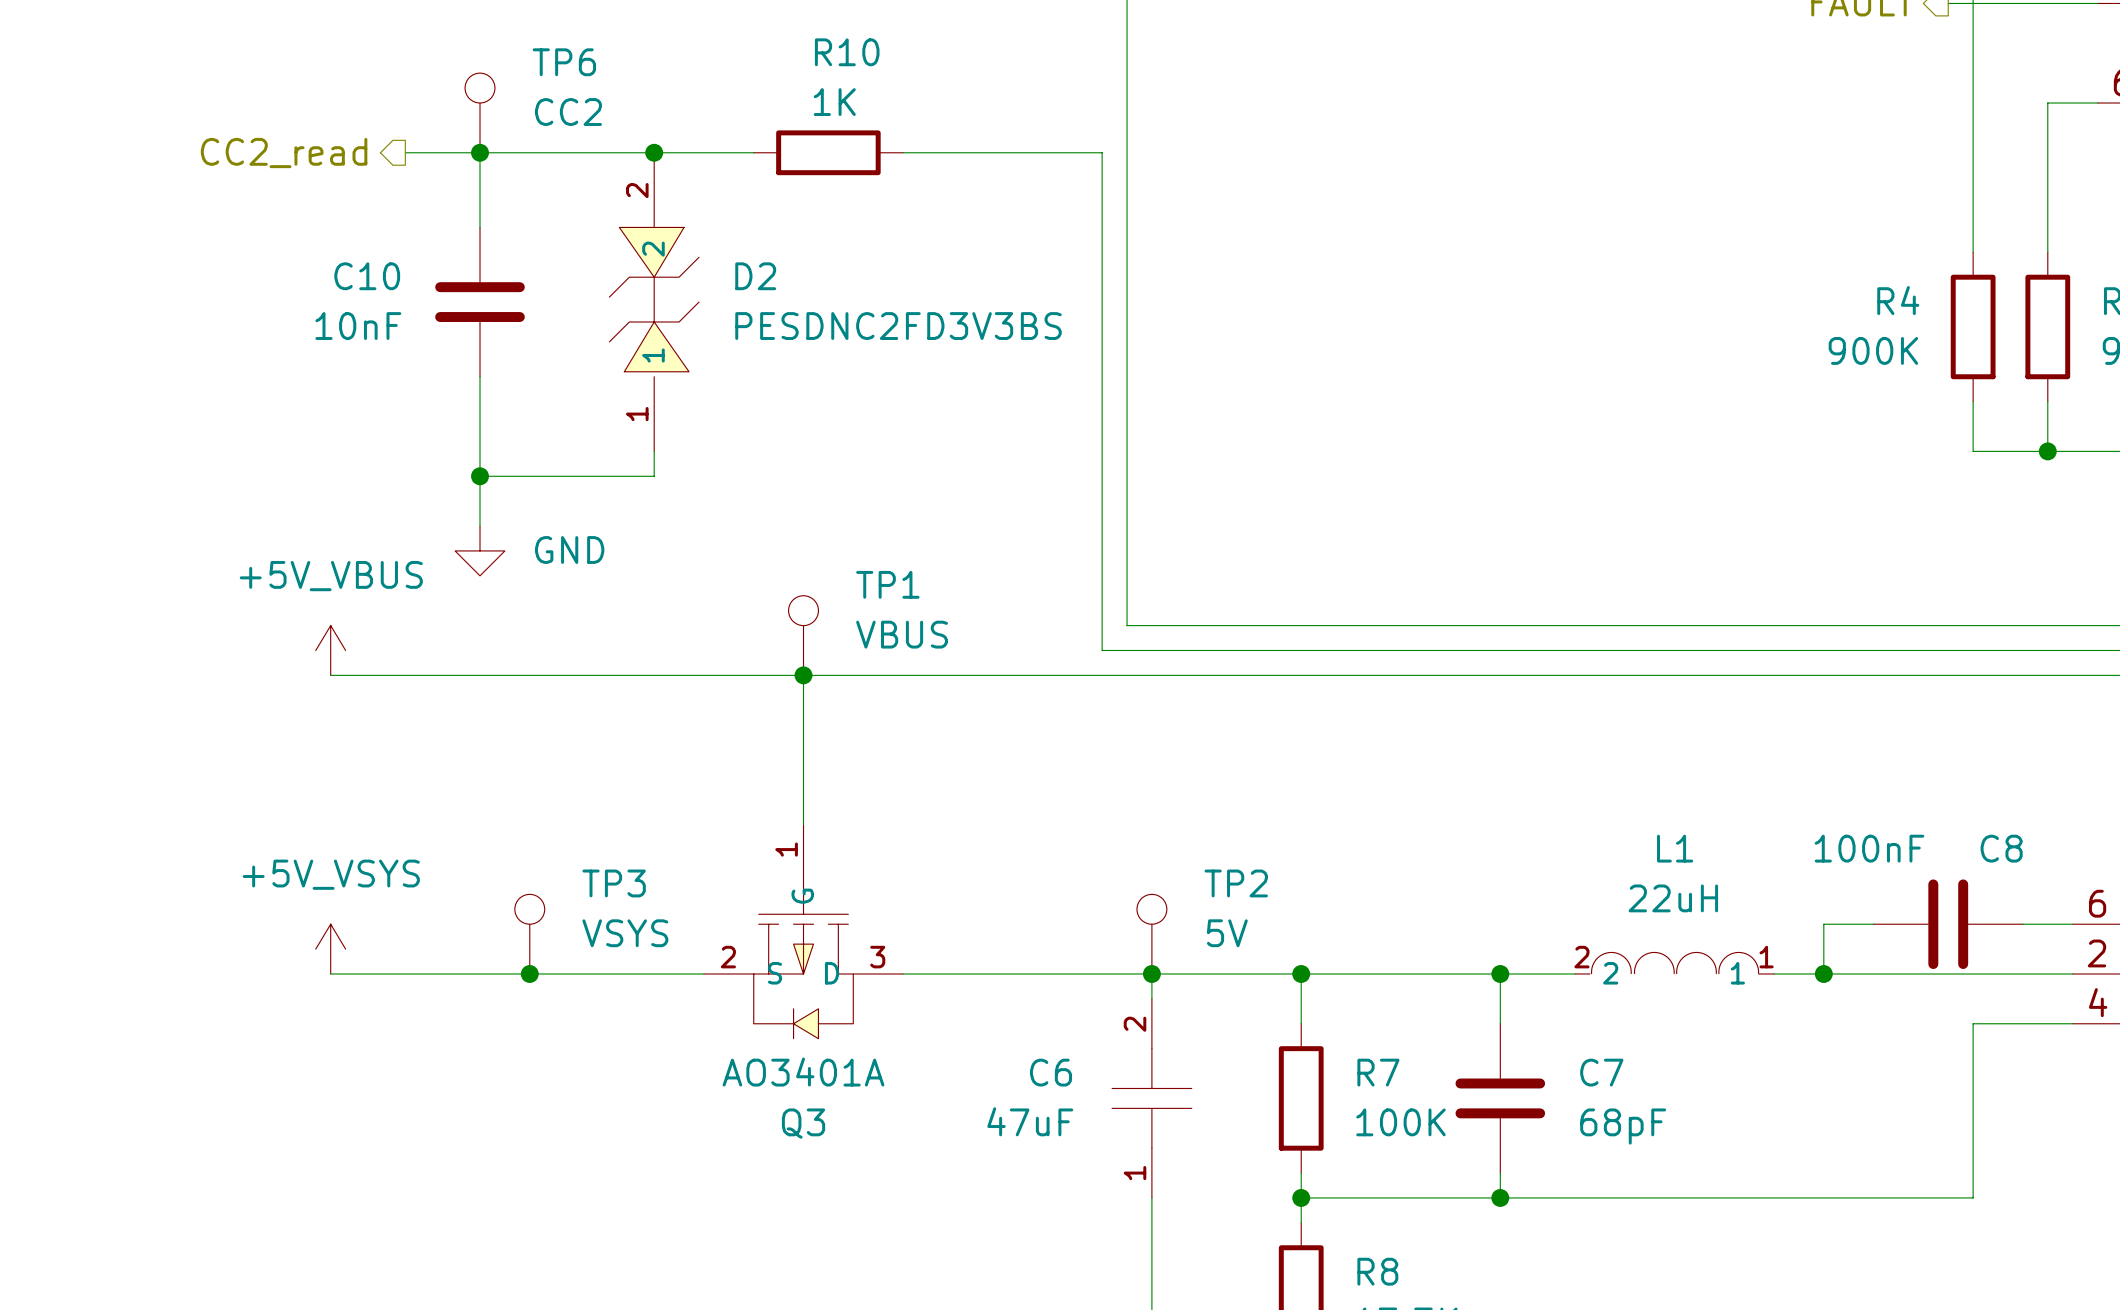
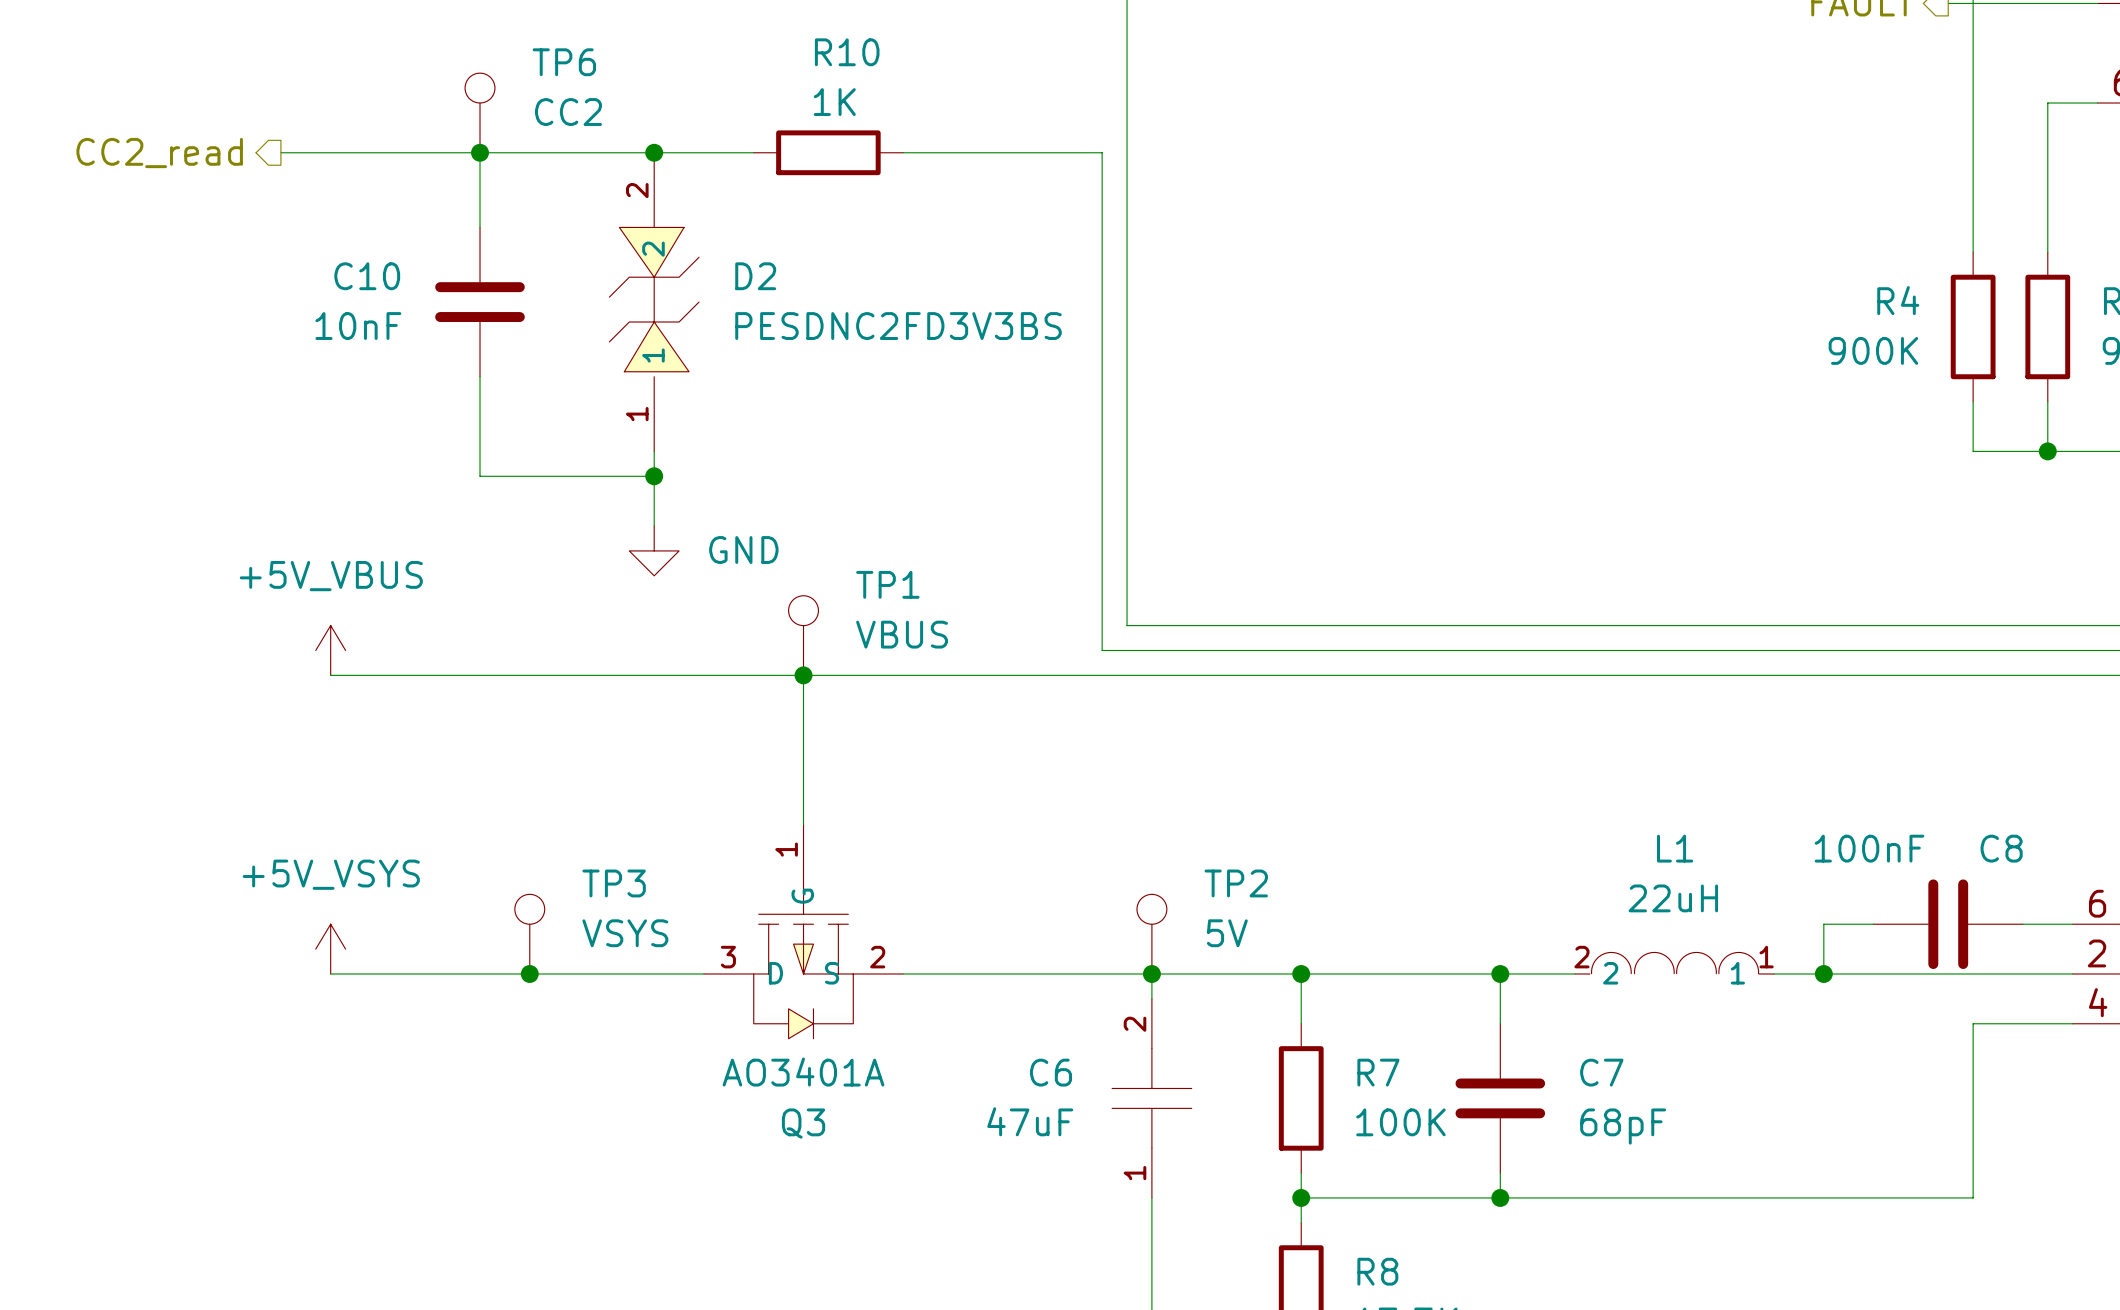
wire: none -> (280, 152) (405, 152)
hierarchical label position: CC2_read (284, 153) -> CC2_read (159, 153)
wire: (480, 476) (480, 526) -> (654, 476) (654, 526)
junction: (480, 476) -> none
junction: none -> (654, 476)
power symbol position: GND (480, 550) -> GND (654, 550)
Q3 flip: as is (803, 956) -> left-right (803, 956)

